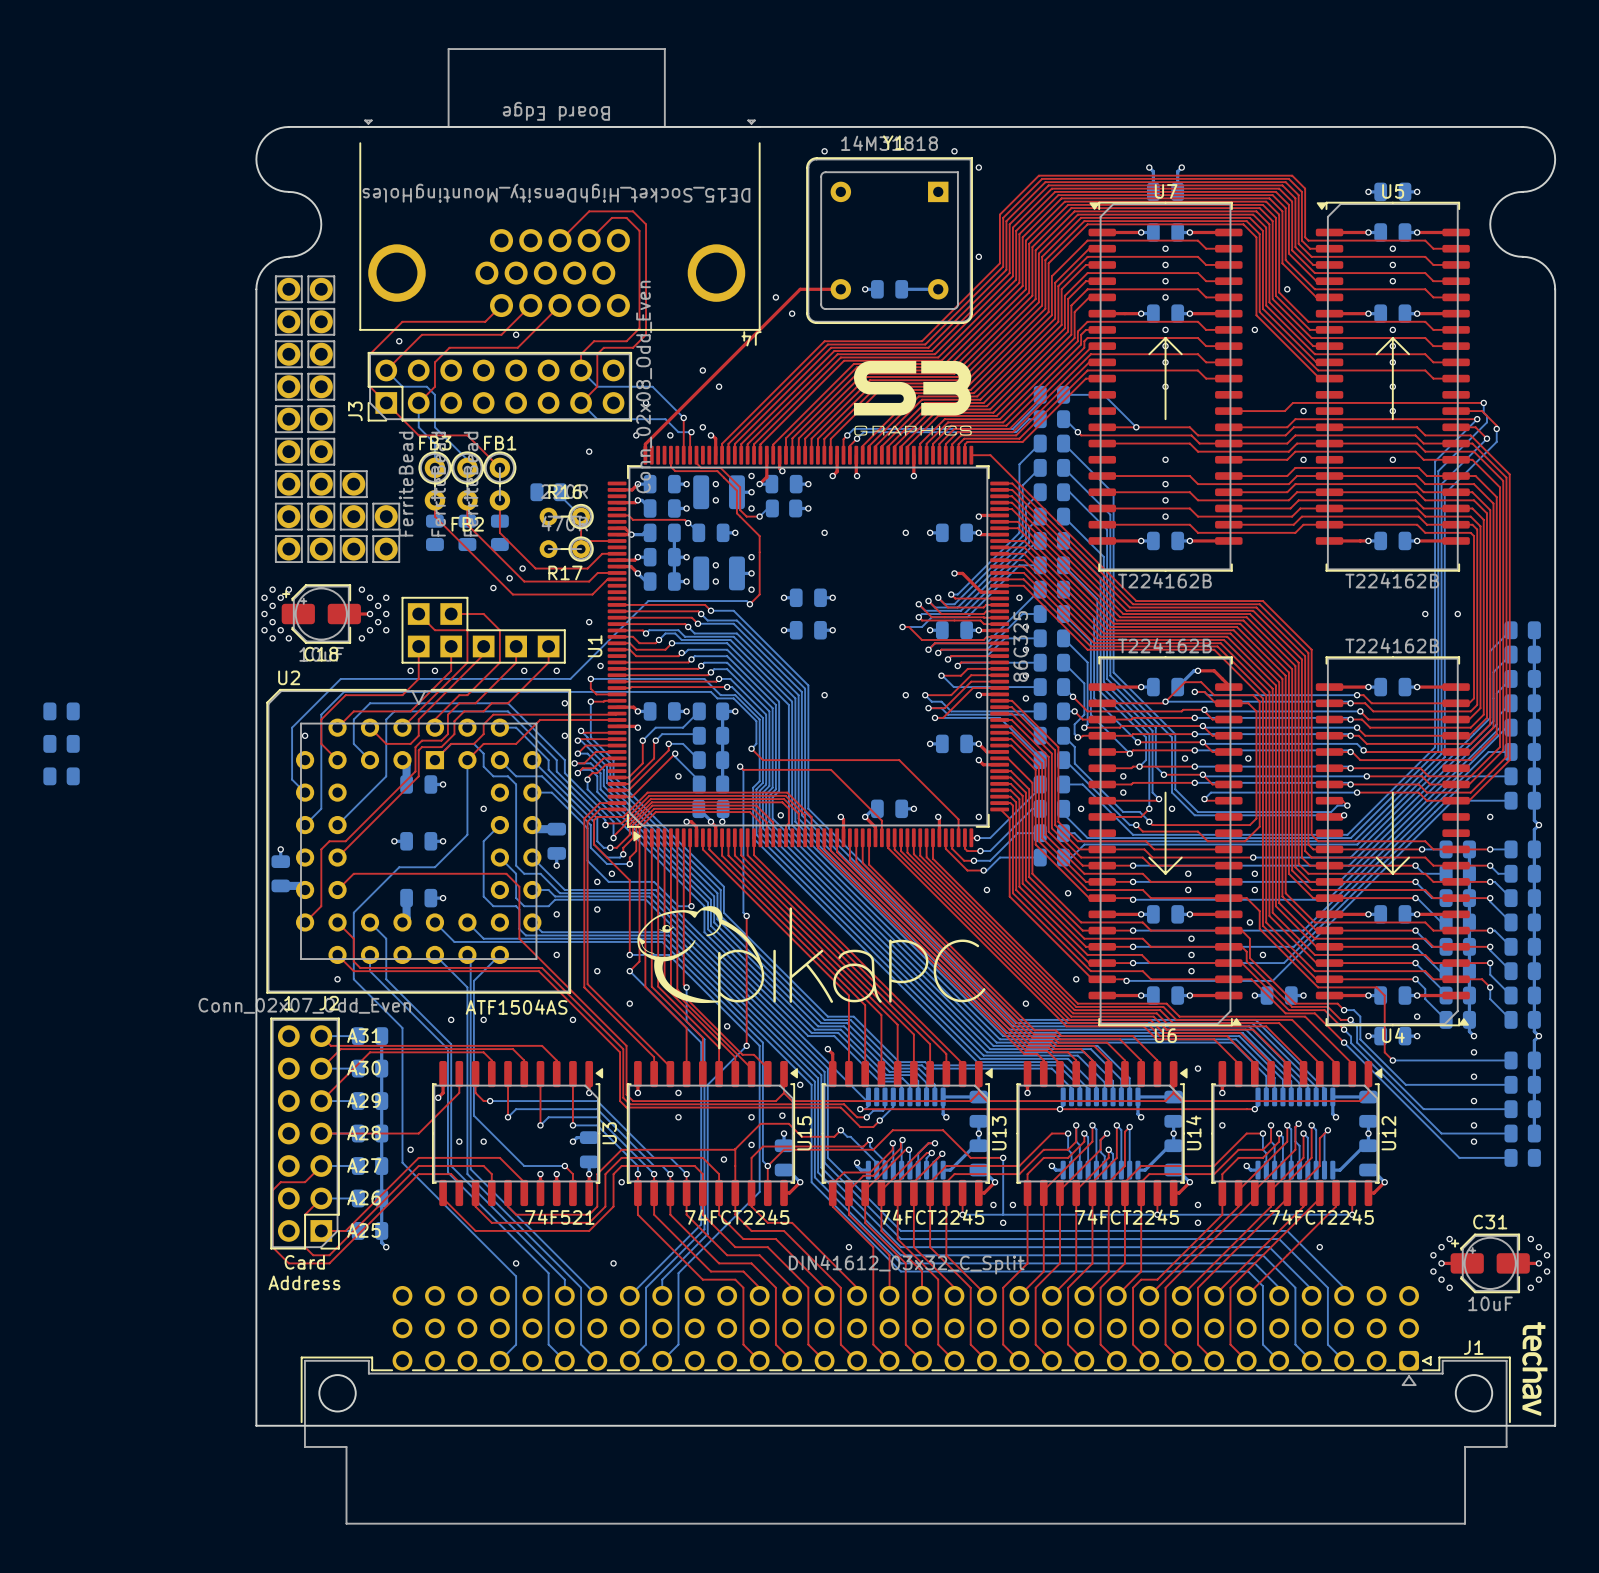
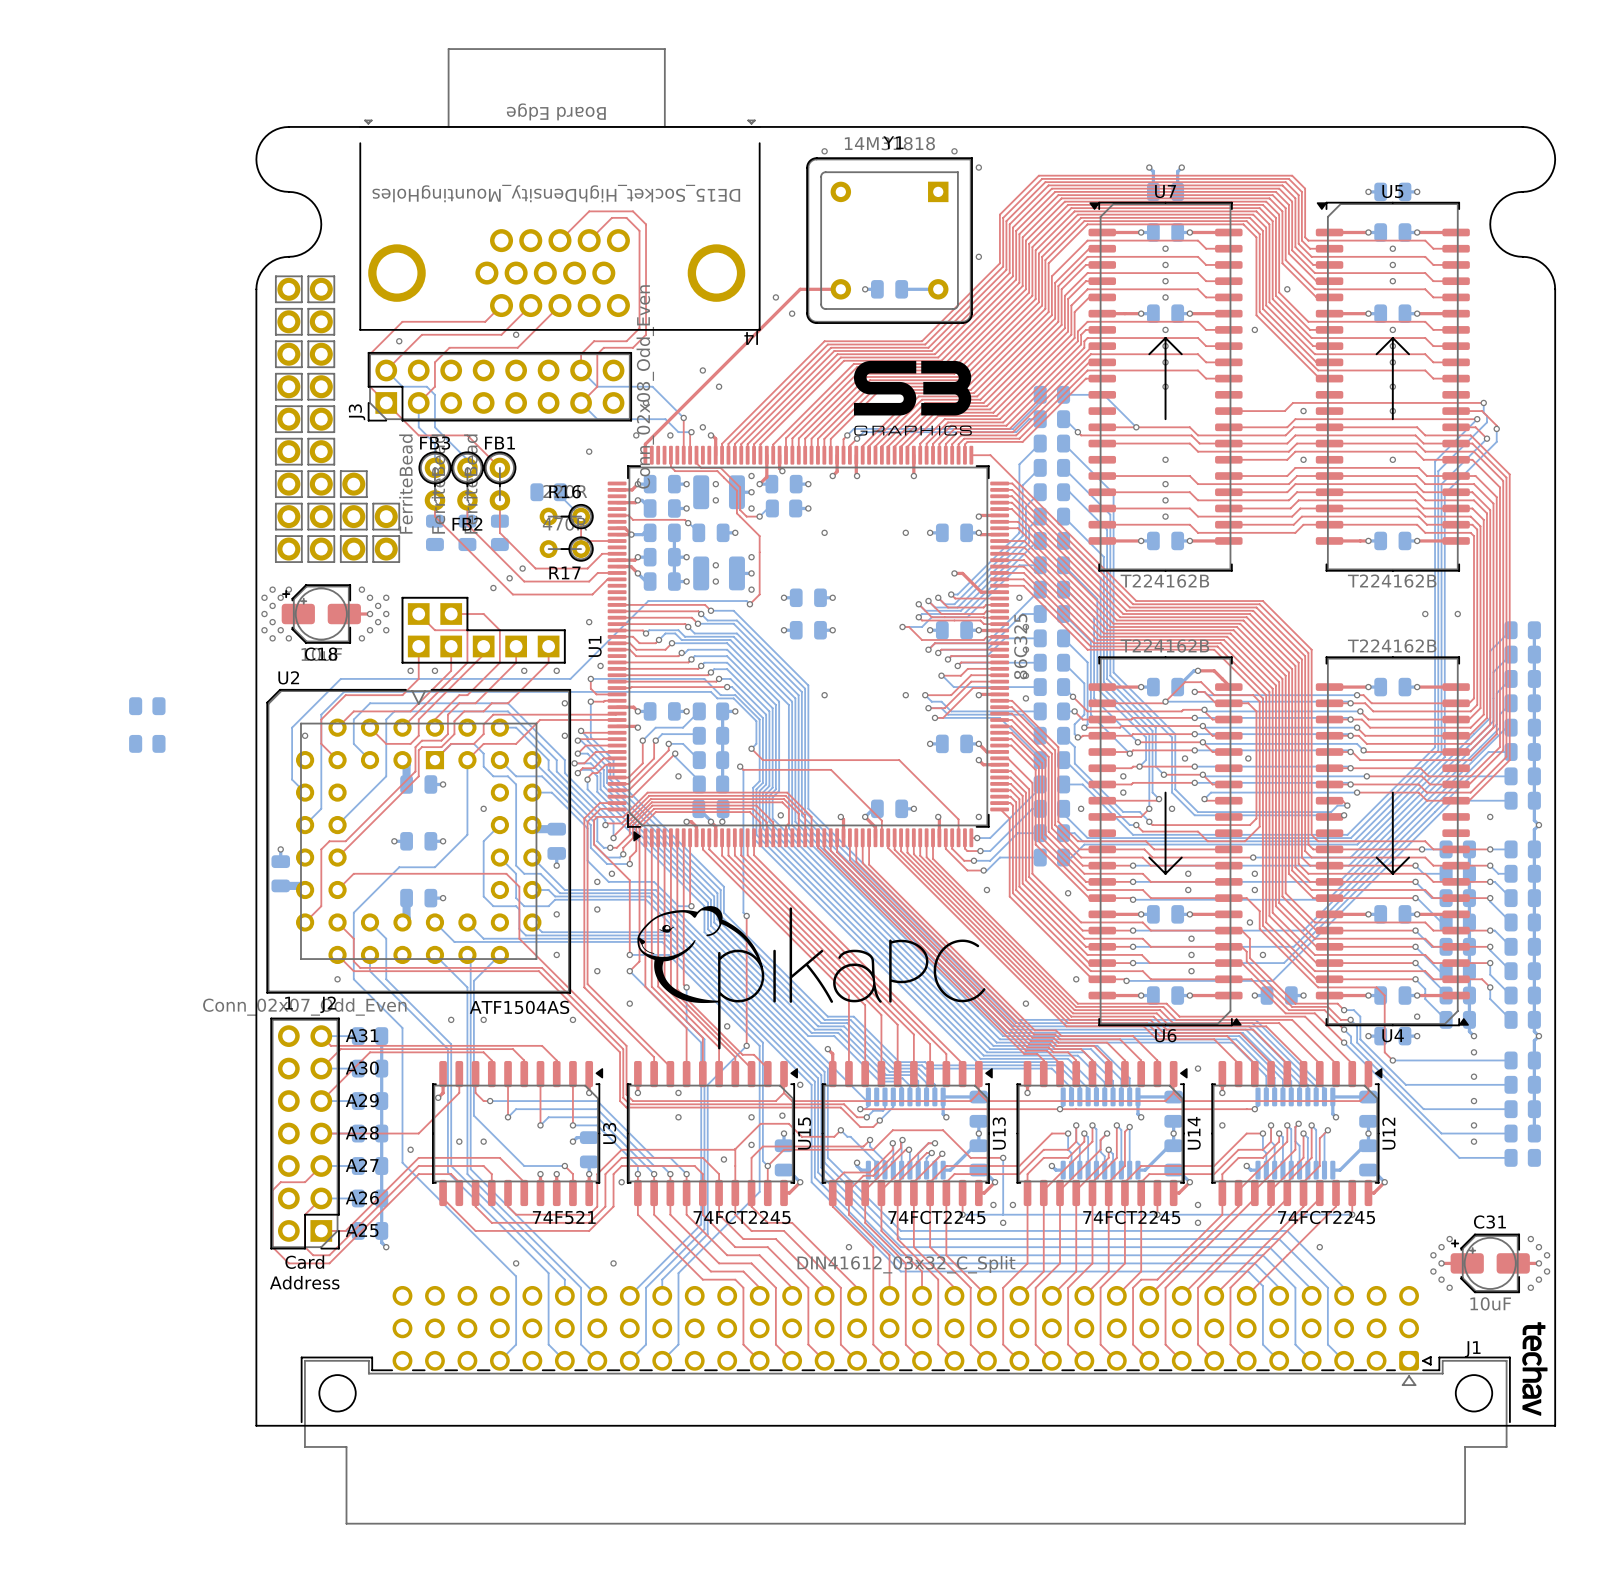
part: none -> (147, 706)
part: (61, 711) -> none
part: (61, 743) -> none
part: none -> (147, 743)
part: (61, 776) -> none

